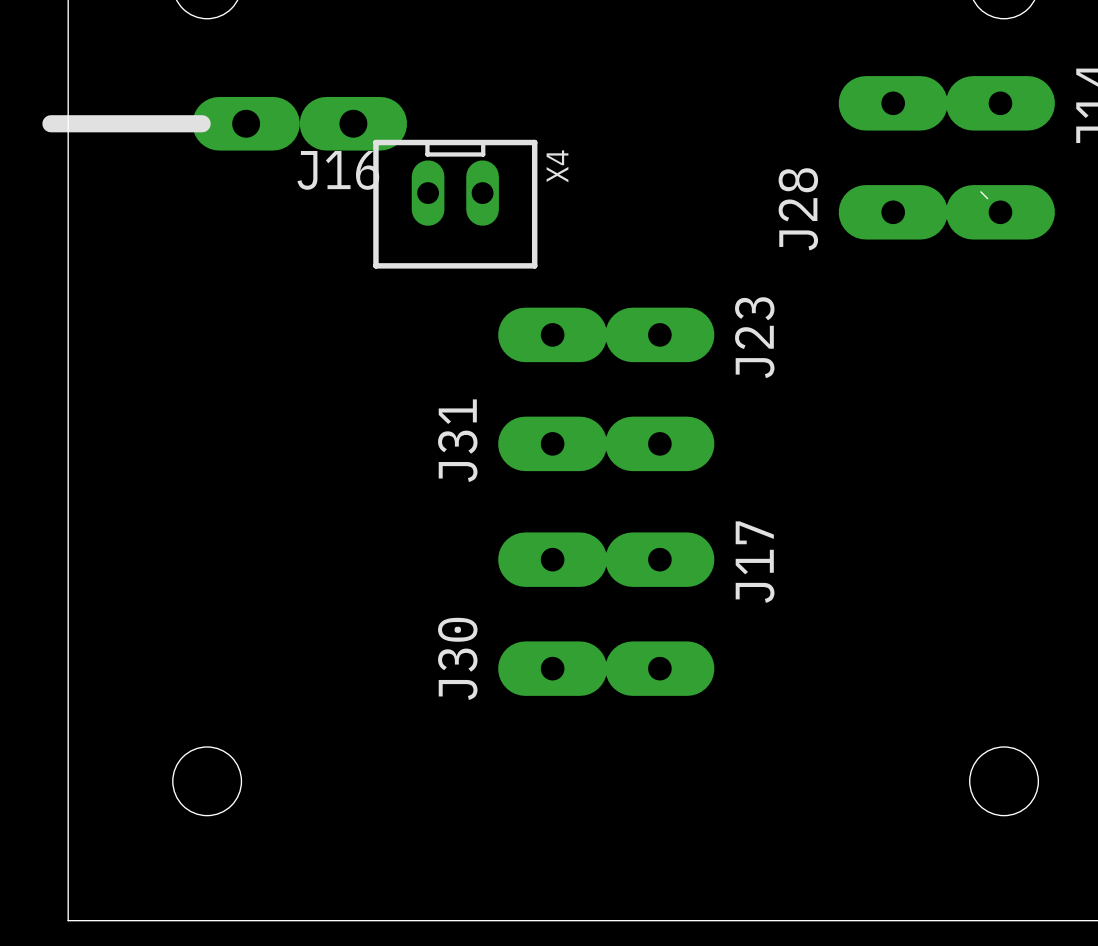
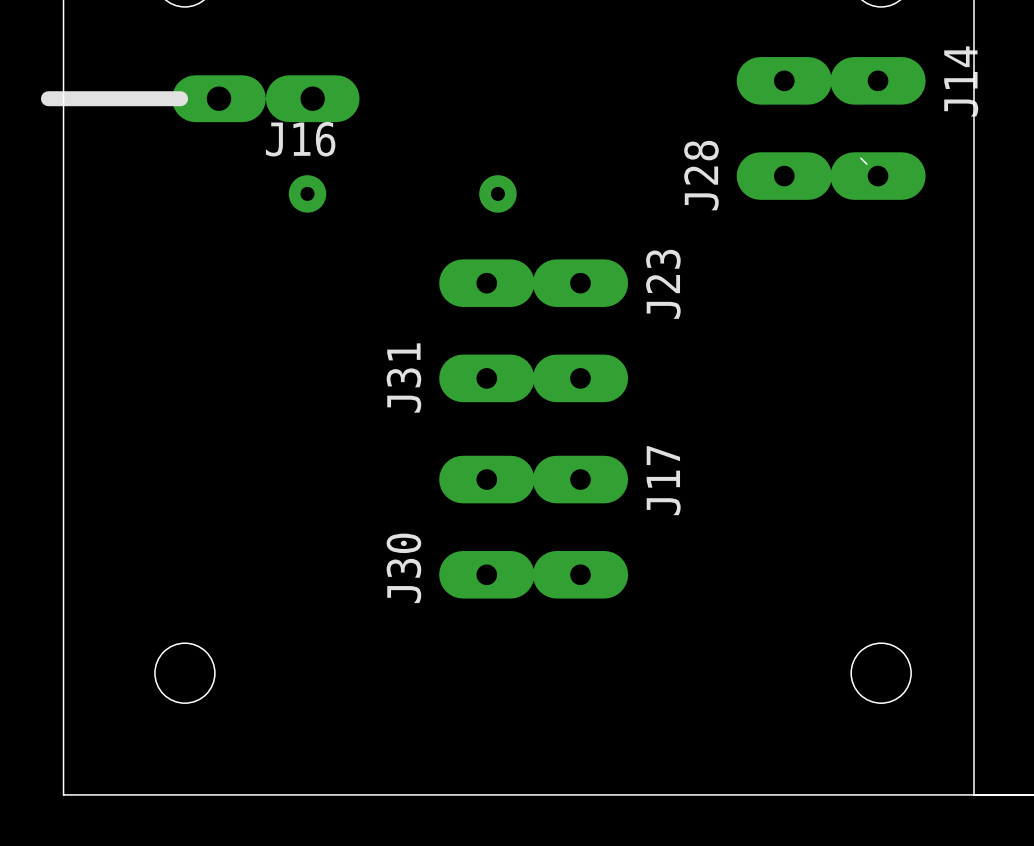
X4: (455, 204) -> none
via: none -> (307, 193)
via: none -> (497, 193)

